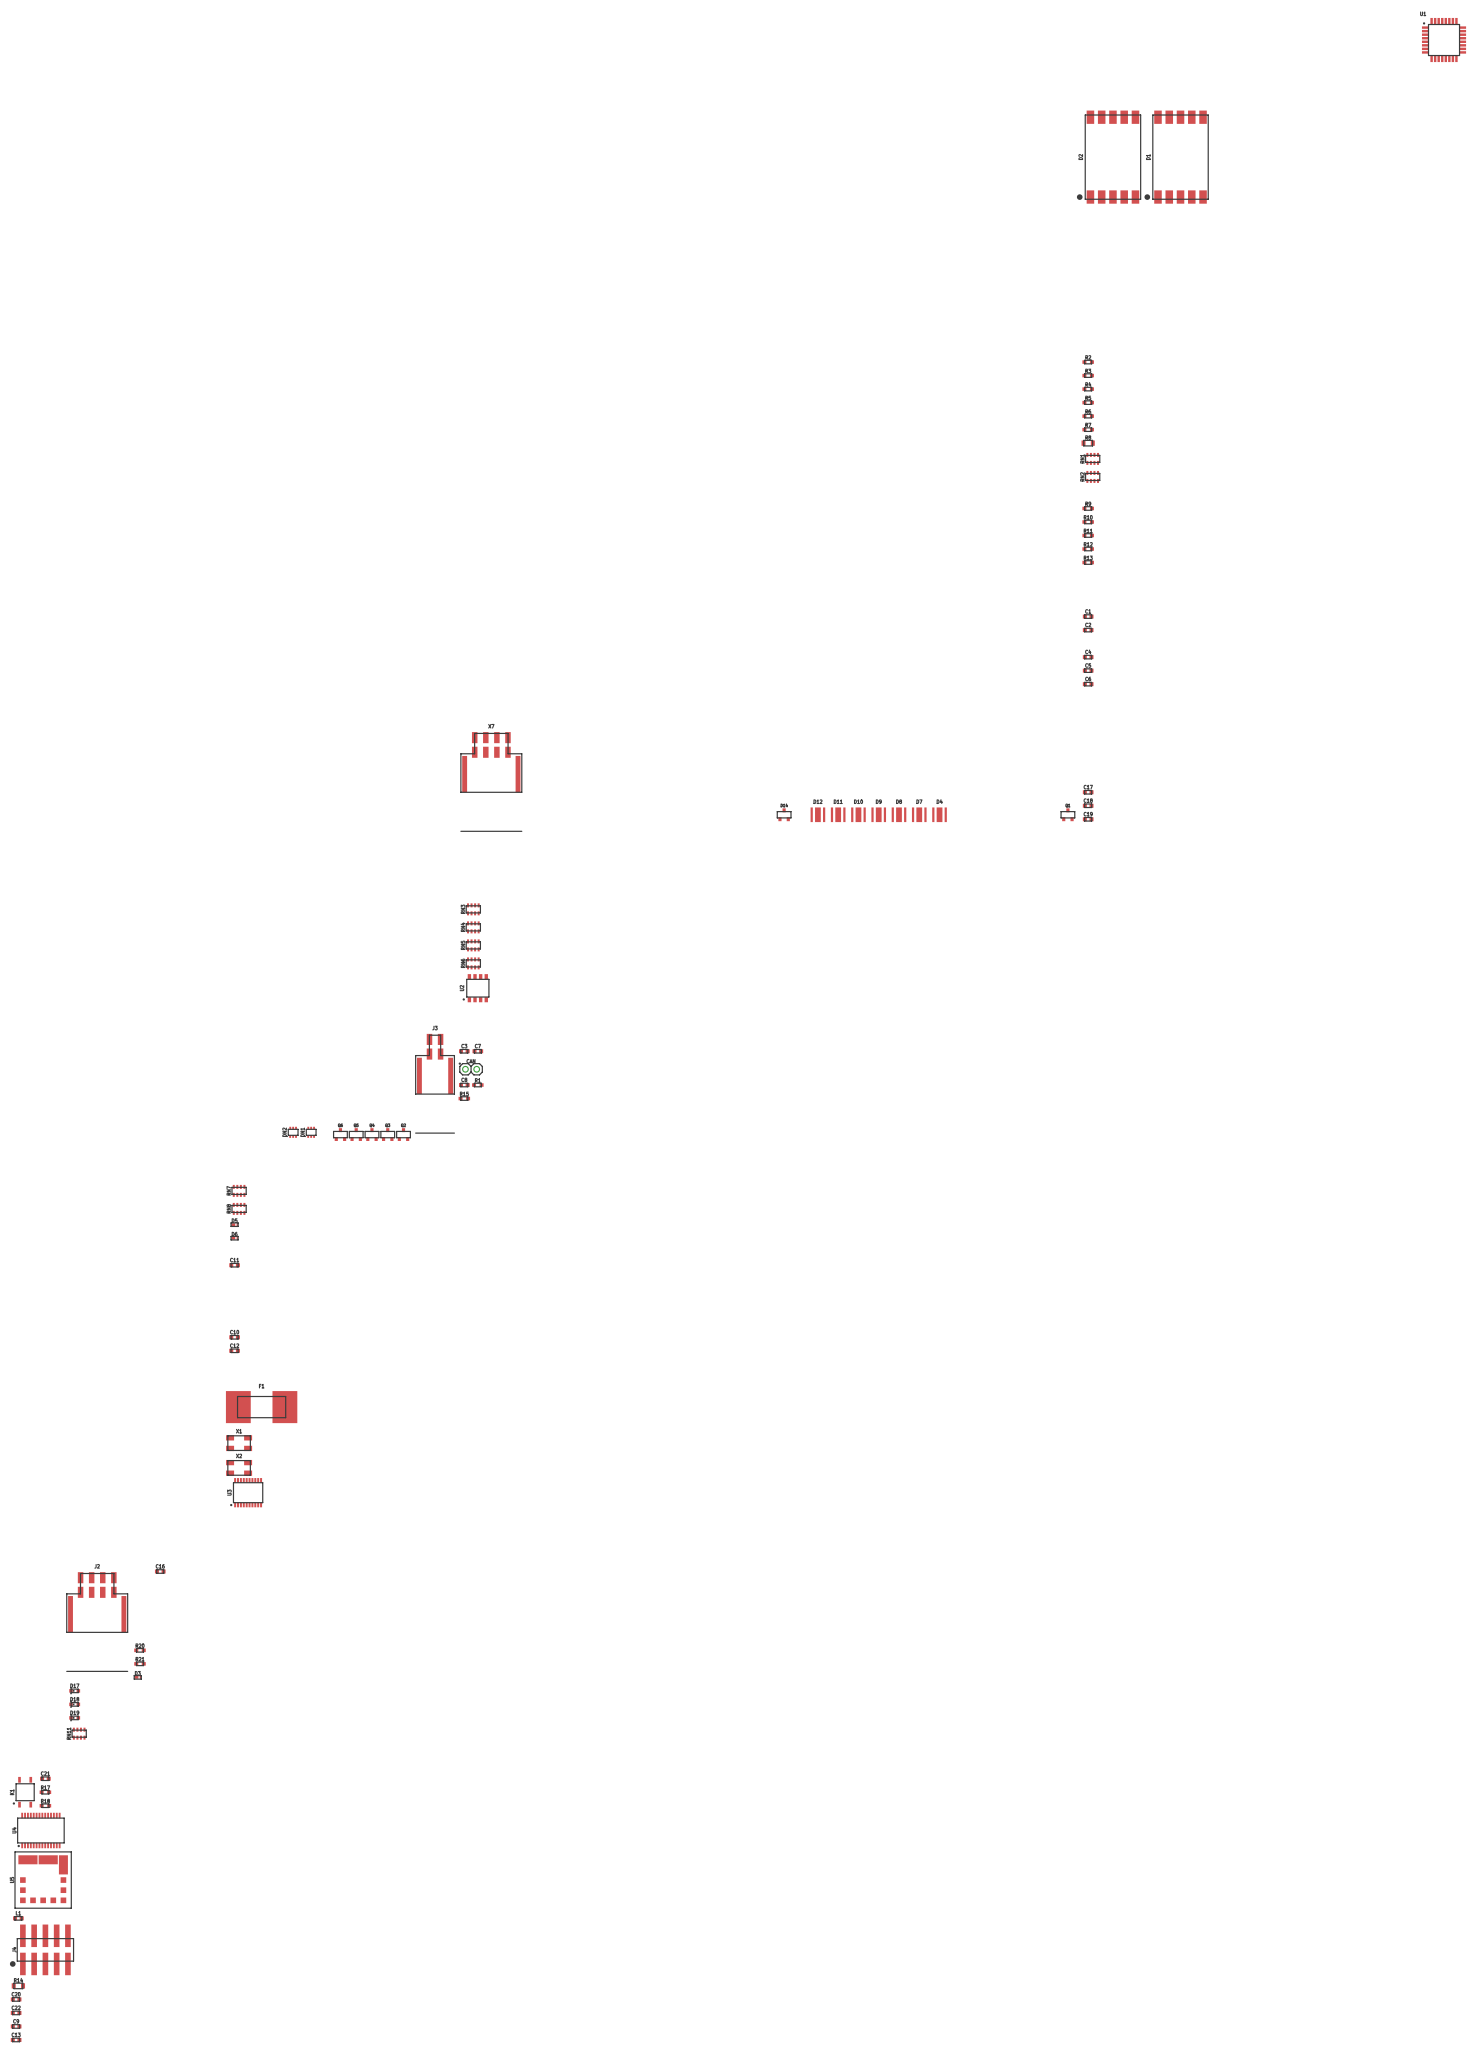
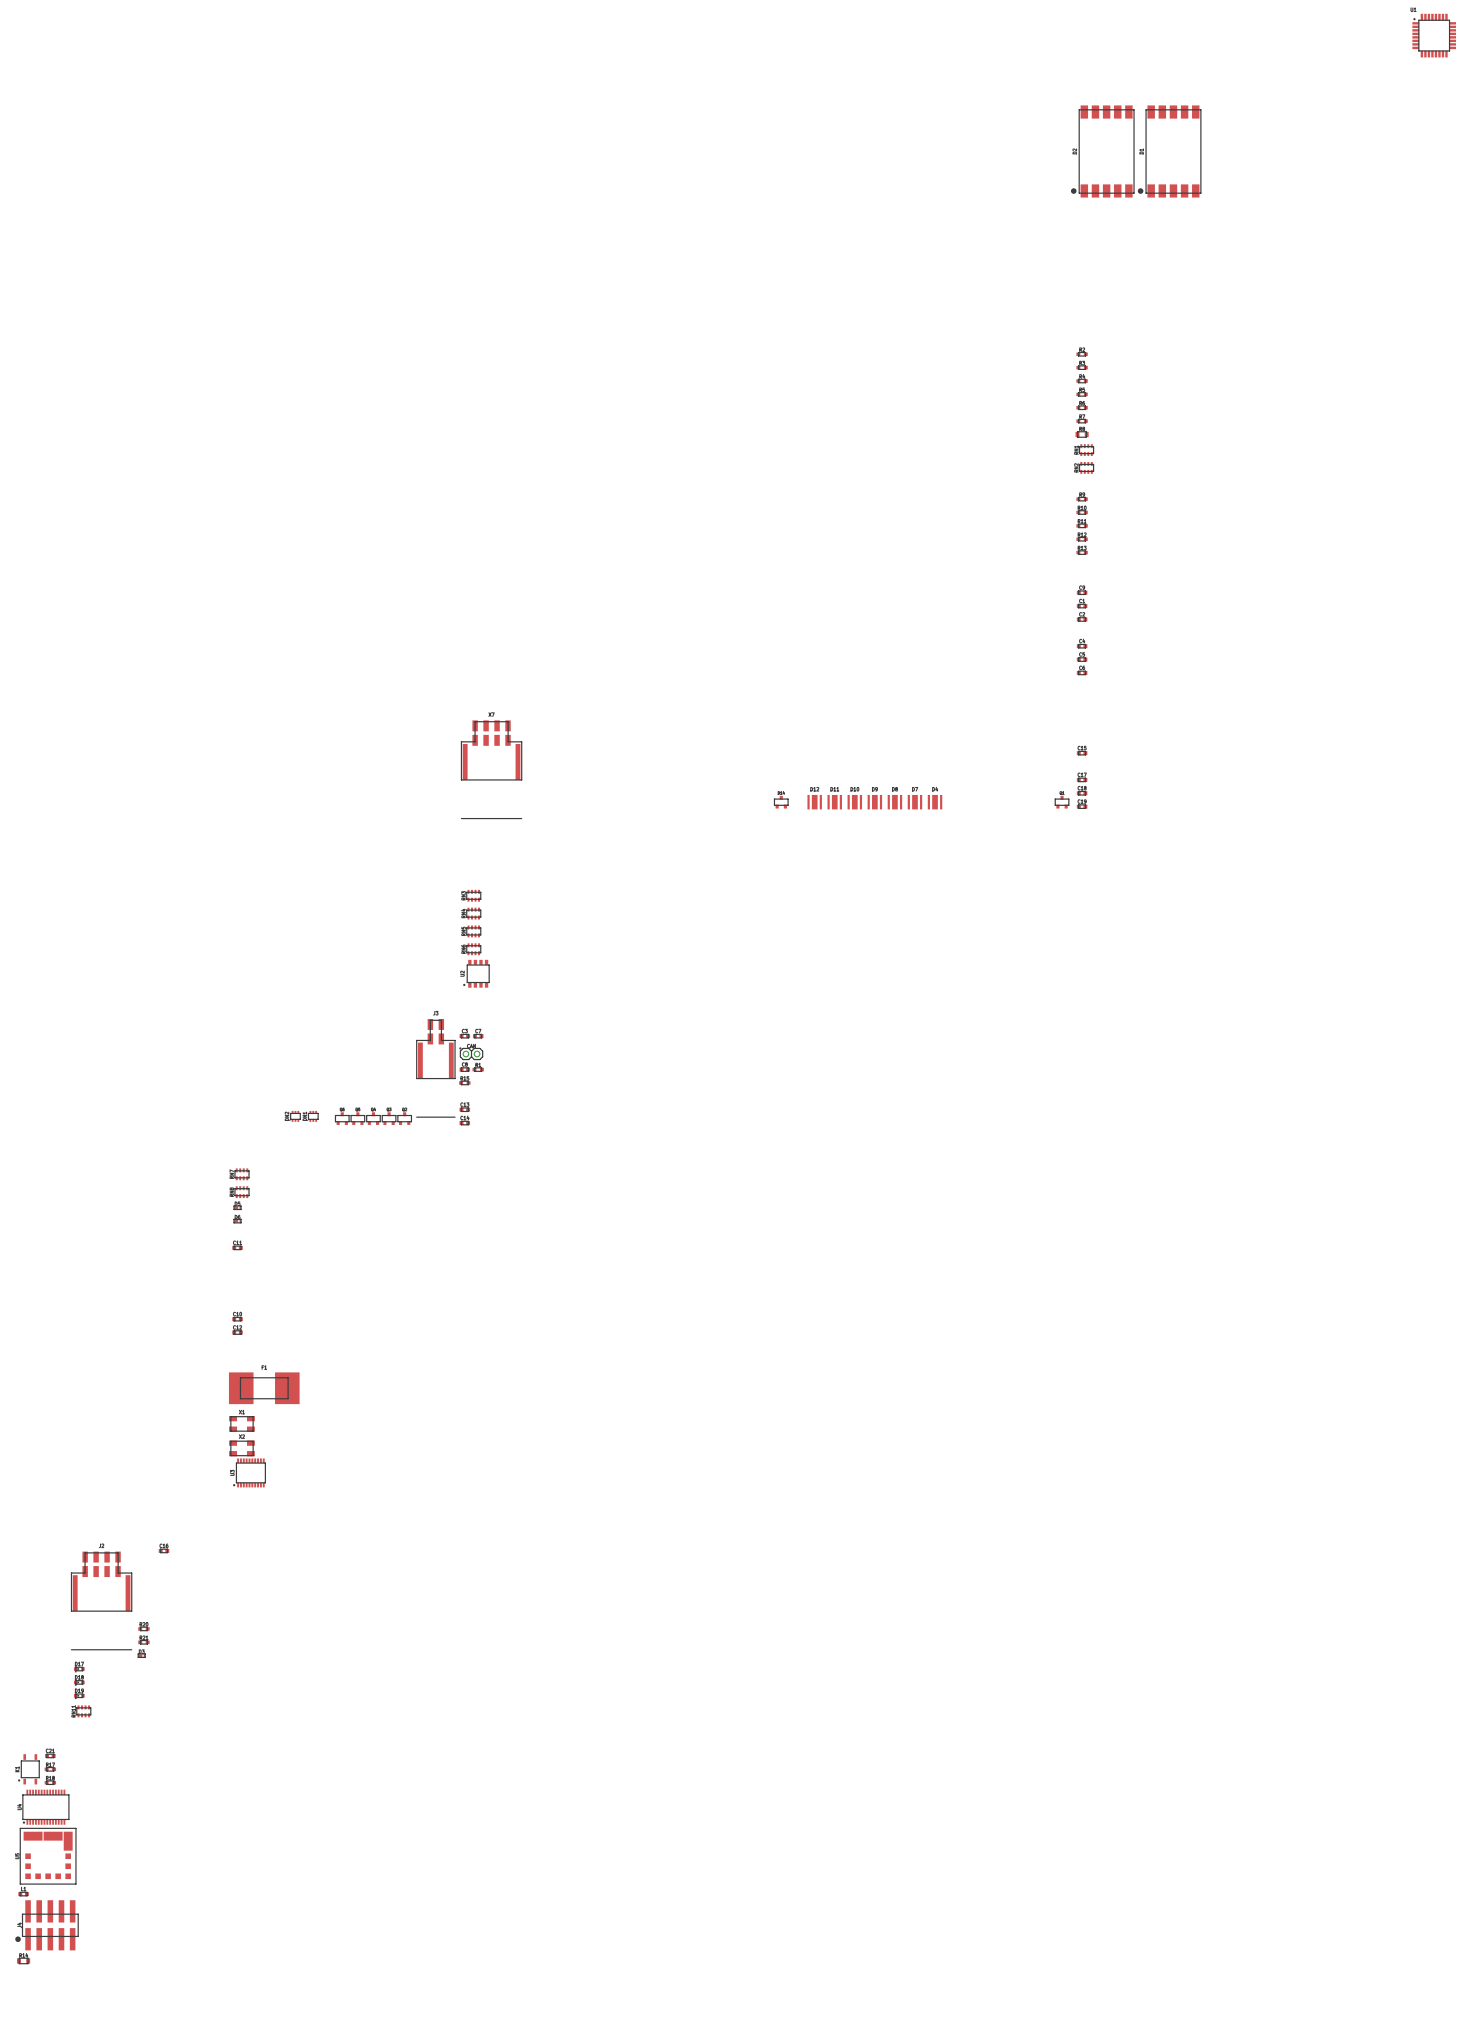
part: none -> (1082, 753)
part: none -> (464, 1123)
part: (16, 1999) -> none
part: (16, 2012) -> none
part position: (16, 2026) -> (1082, 592)
part position: (16, 2039) -> (464, 1109)

